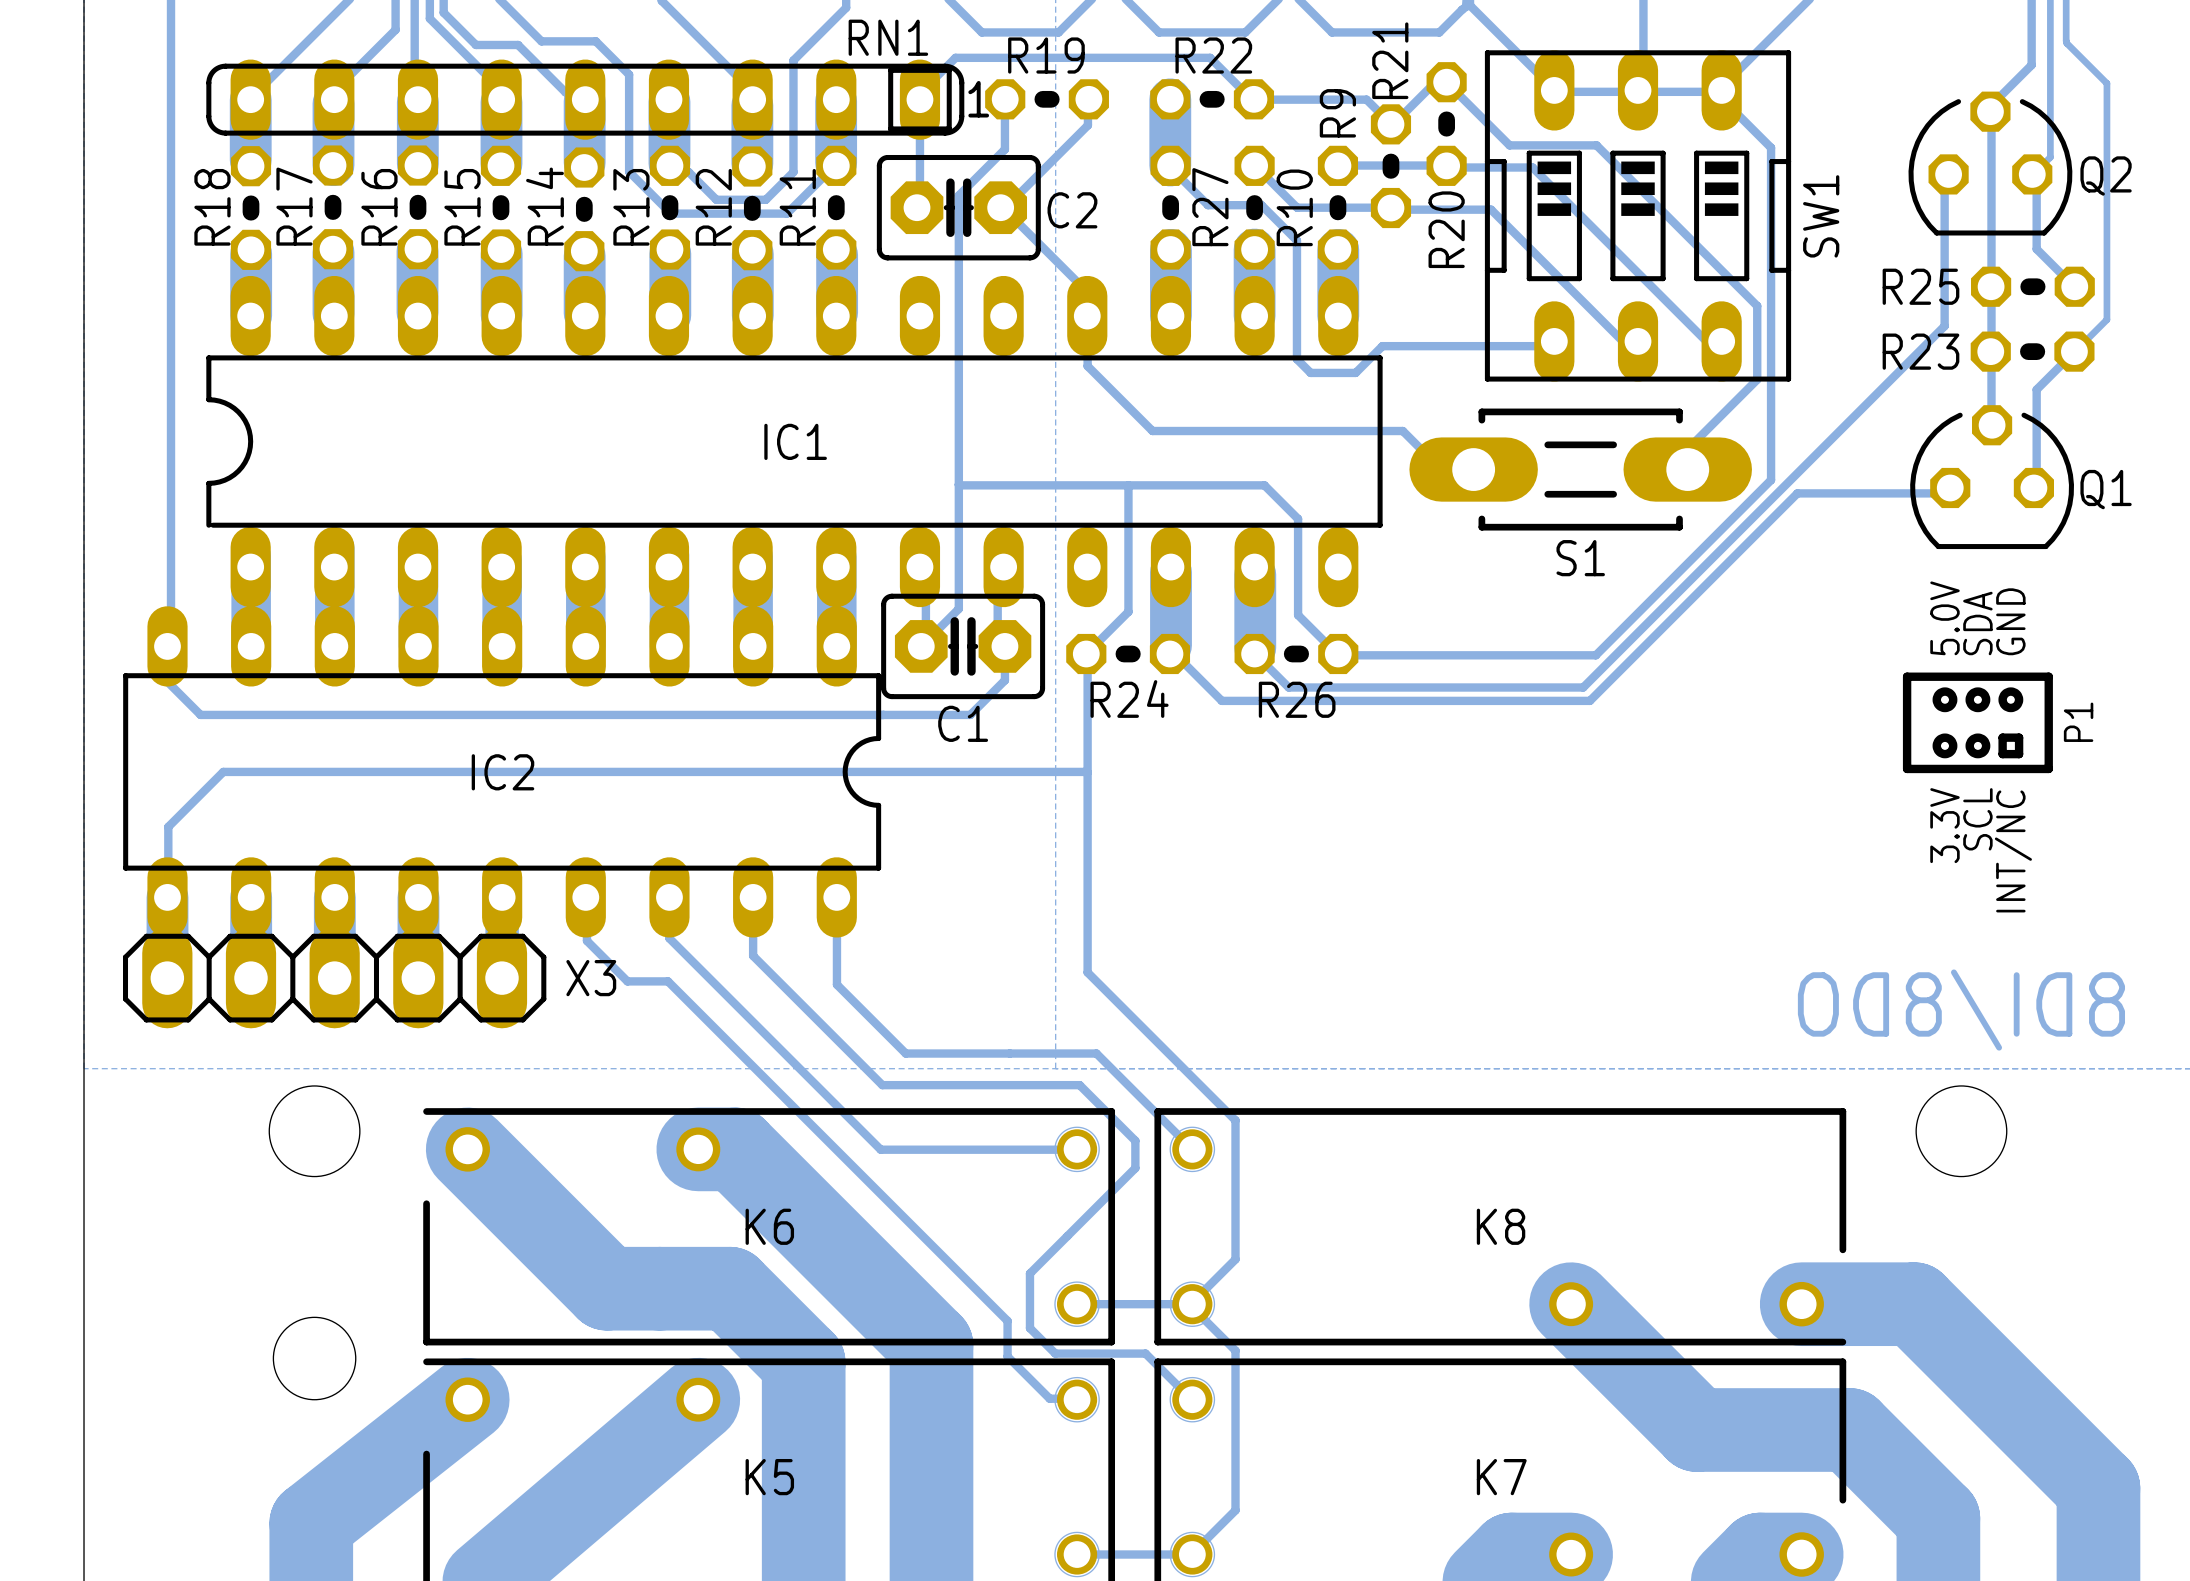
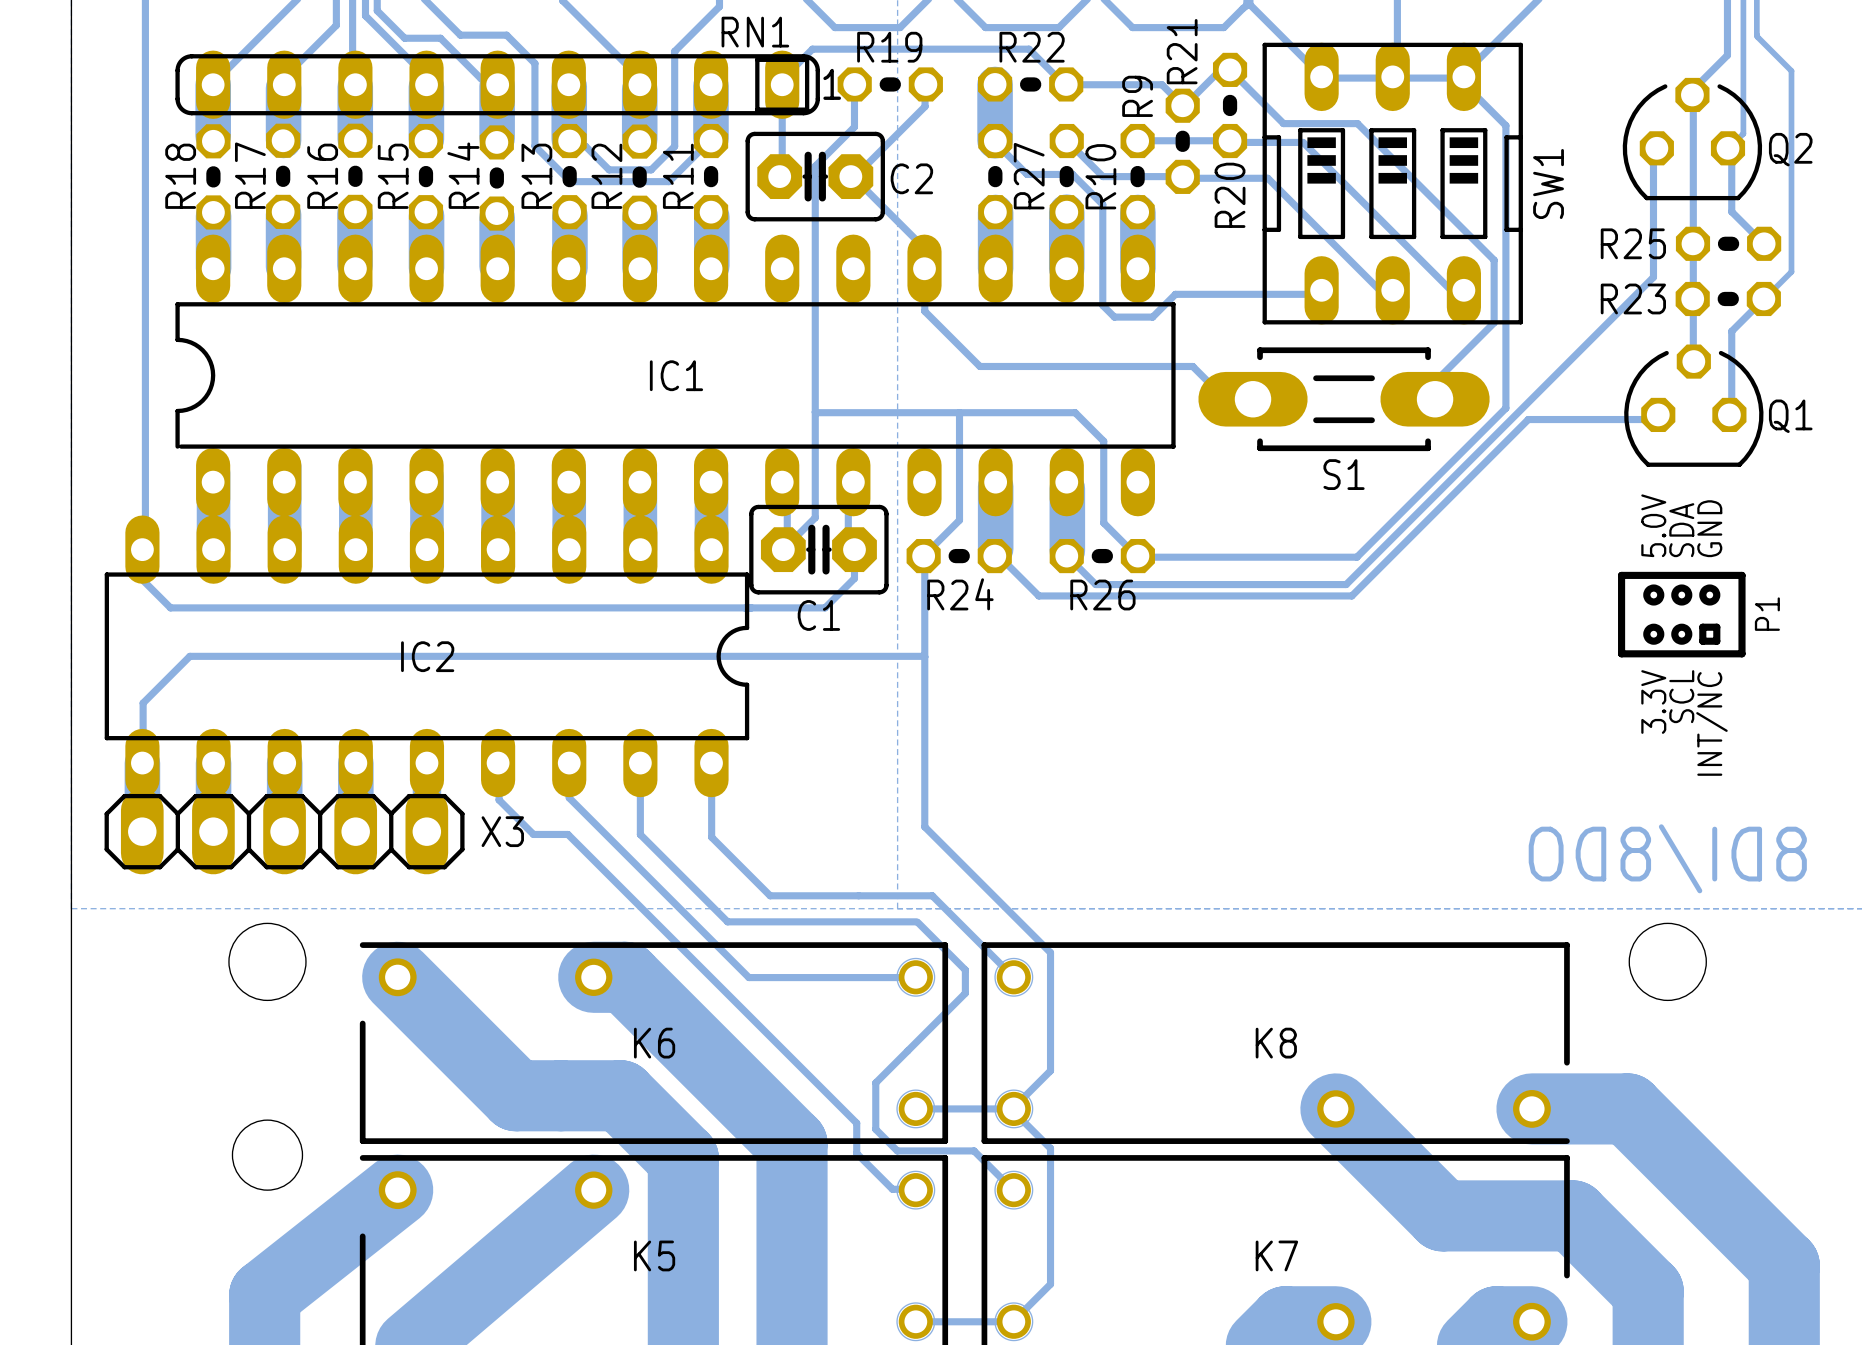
bottom track: (753, 955) (882, 1085) (1079, 1085) -> (640, 812) (640, 834) (727, 921) (916, 921)

